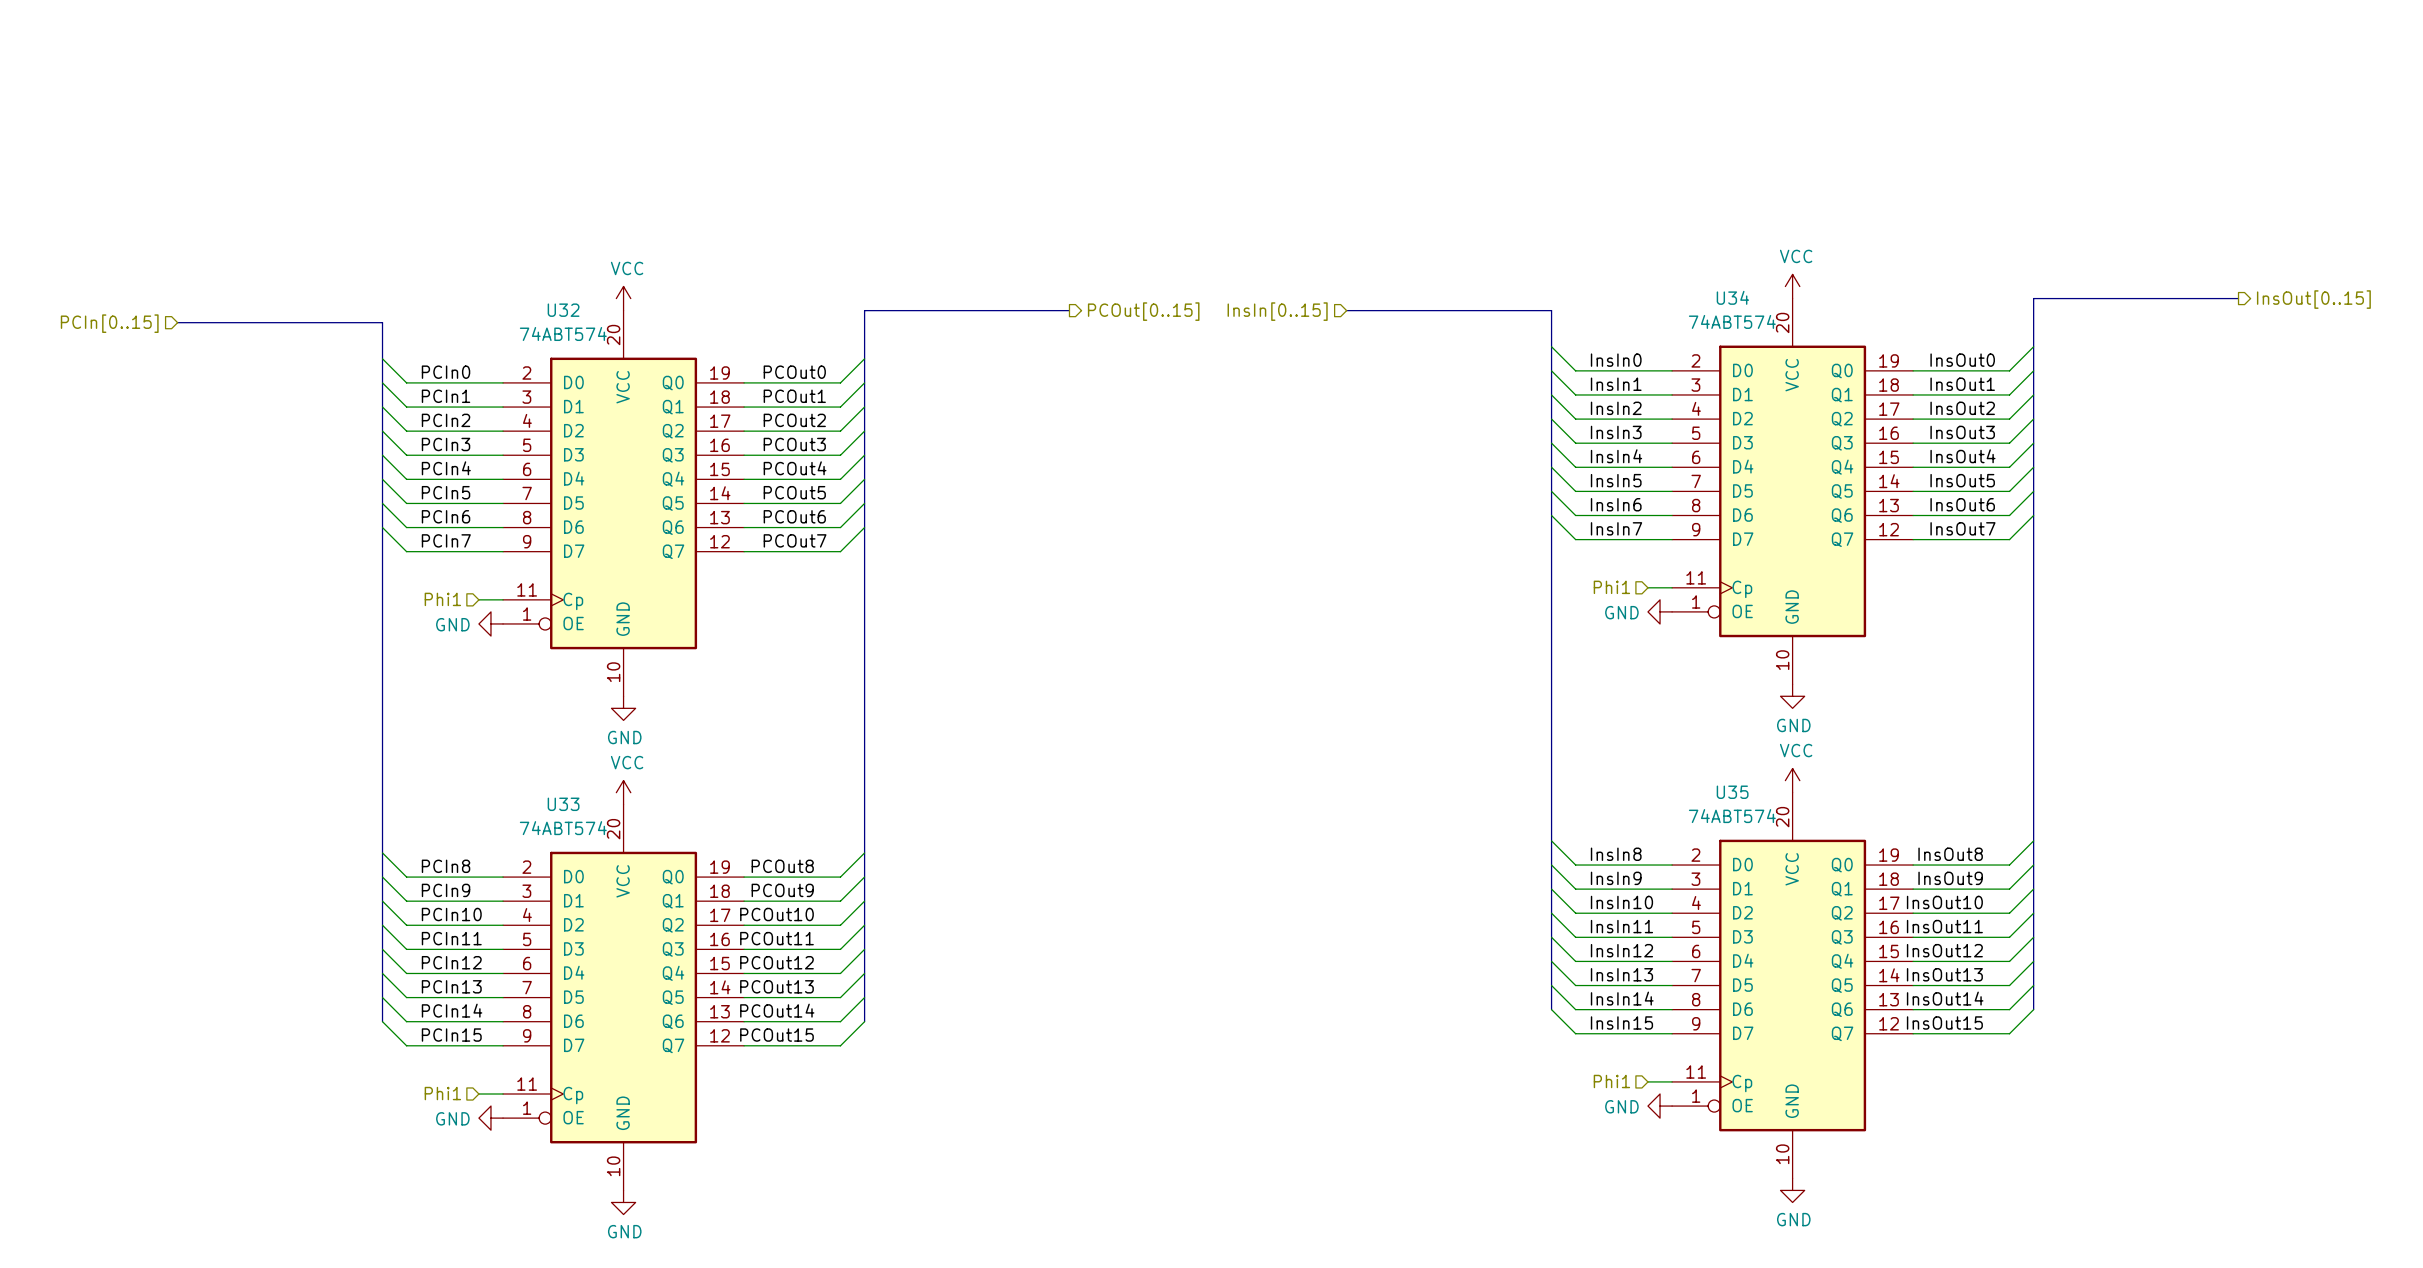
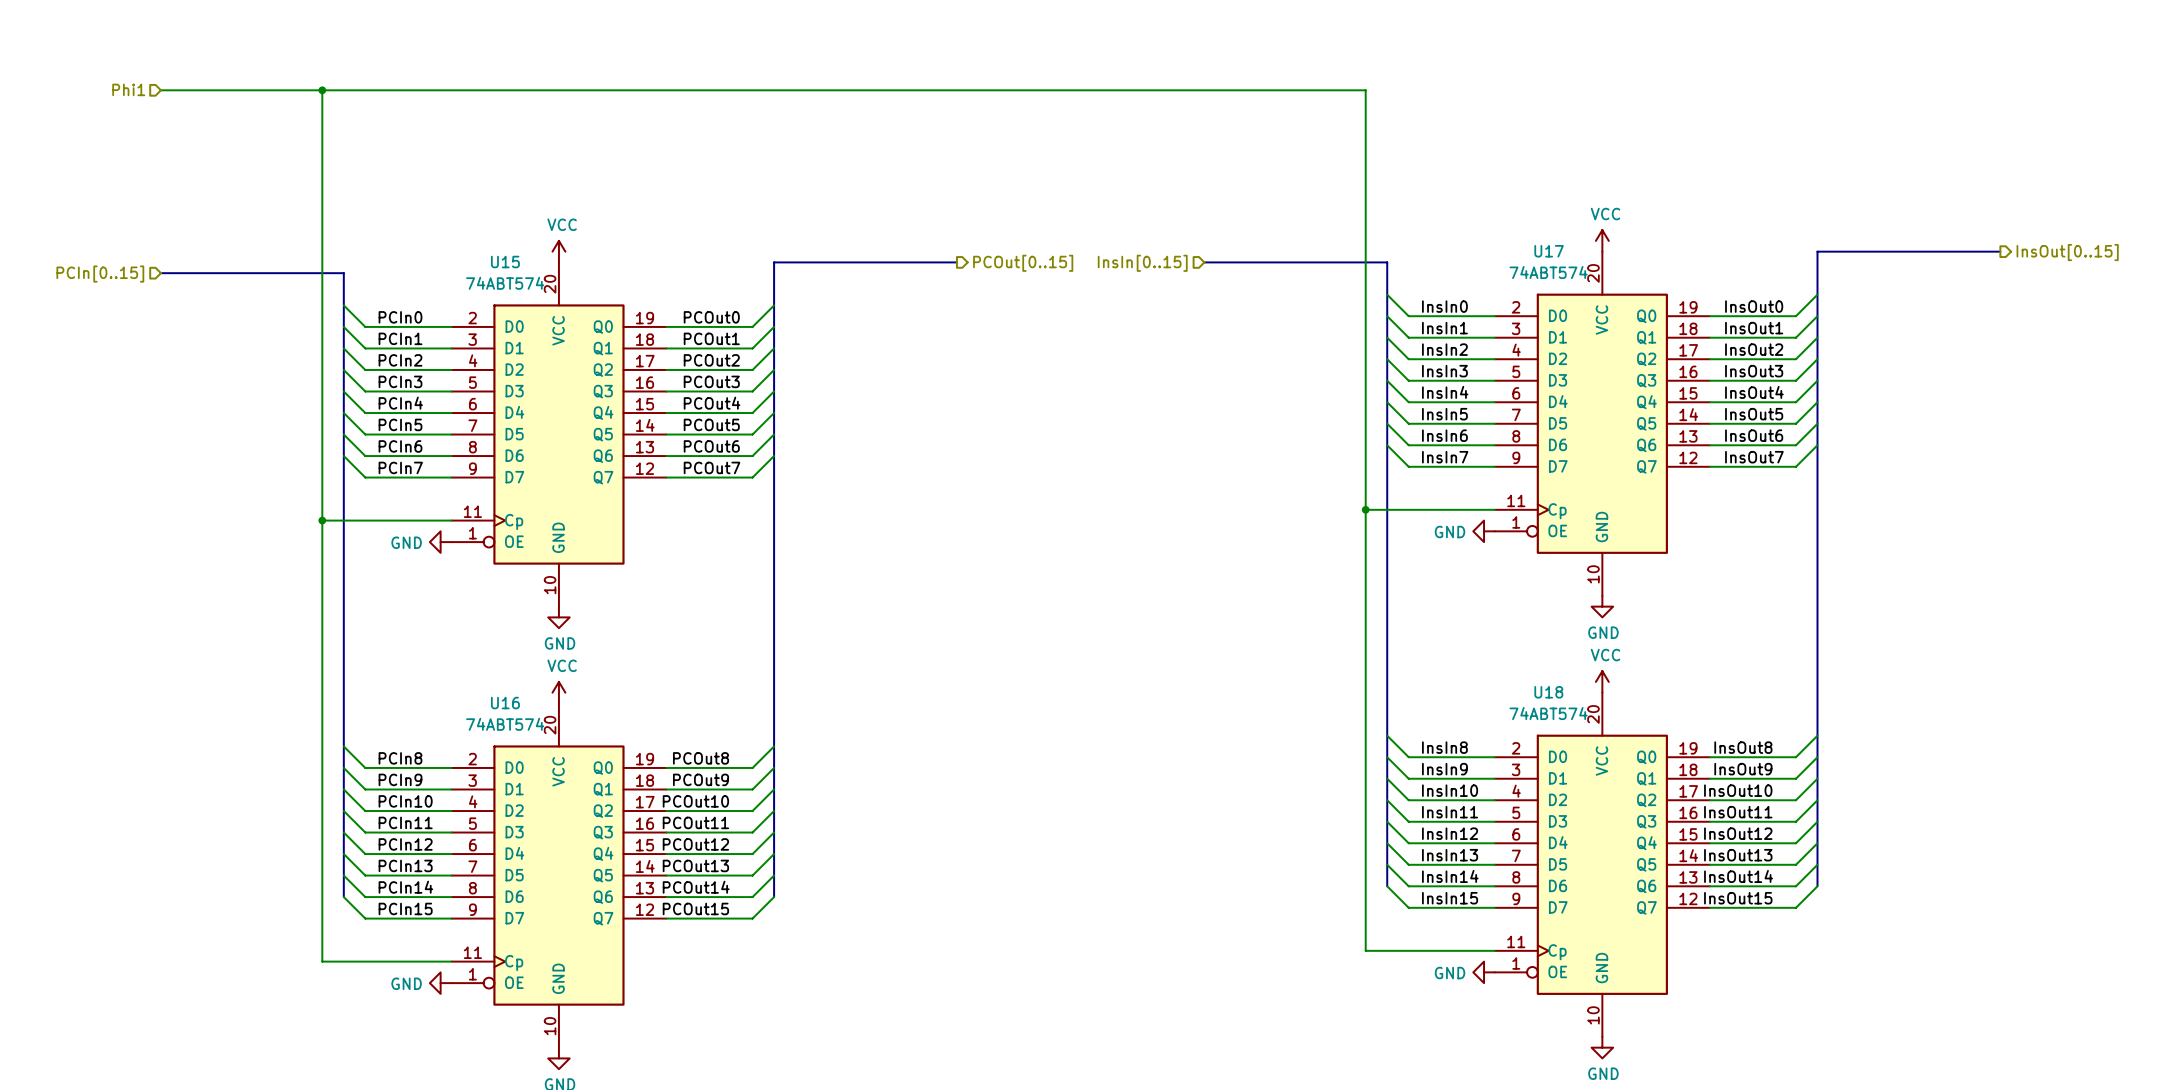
hierarchical label: none -> Phi1 (128, 89)
wire: none -> (160, 90) (1365, 90) (1365, 950) (1473, 950)
wire: none -> (322, 90) (322, 961) (429, 961)
junction: none -> (322, 90)
U34 name: U34 (1732, 297) -> U17 (1549, 251)
U32 name: U32 (563, 310) -> U15 (505, 262)
wire: none -> (1365, 509) (1473, 509)
junction: none -> (1365, 509)
hierarchical label: Phi1 (1611, 587) -> none
wire: none -> (322, 520) (429, 520)
junction: none -> (322, 520)
hierarchical label: Phi1 (442, 599) -> none
U35 name: U35 (1732, 792) -> U18 (1548, 692)
U33 name: U33 (563, 804) -> U16 (505, 703)
hierarchical label: Phi1 (1611, 1081) -> none
hierarchical label: Phi1 (442, 1093) -> none

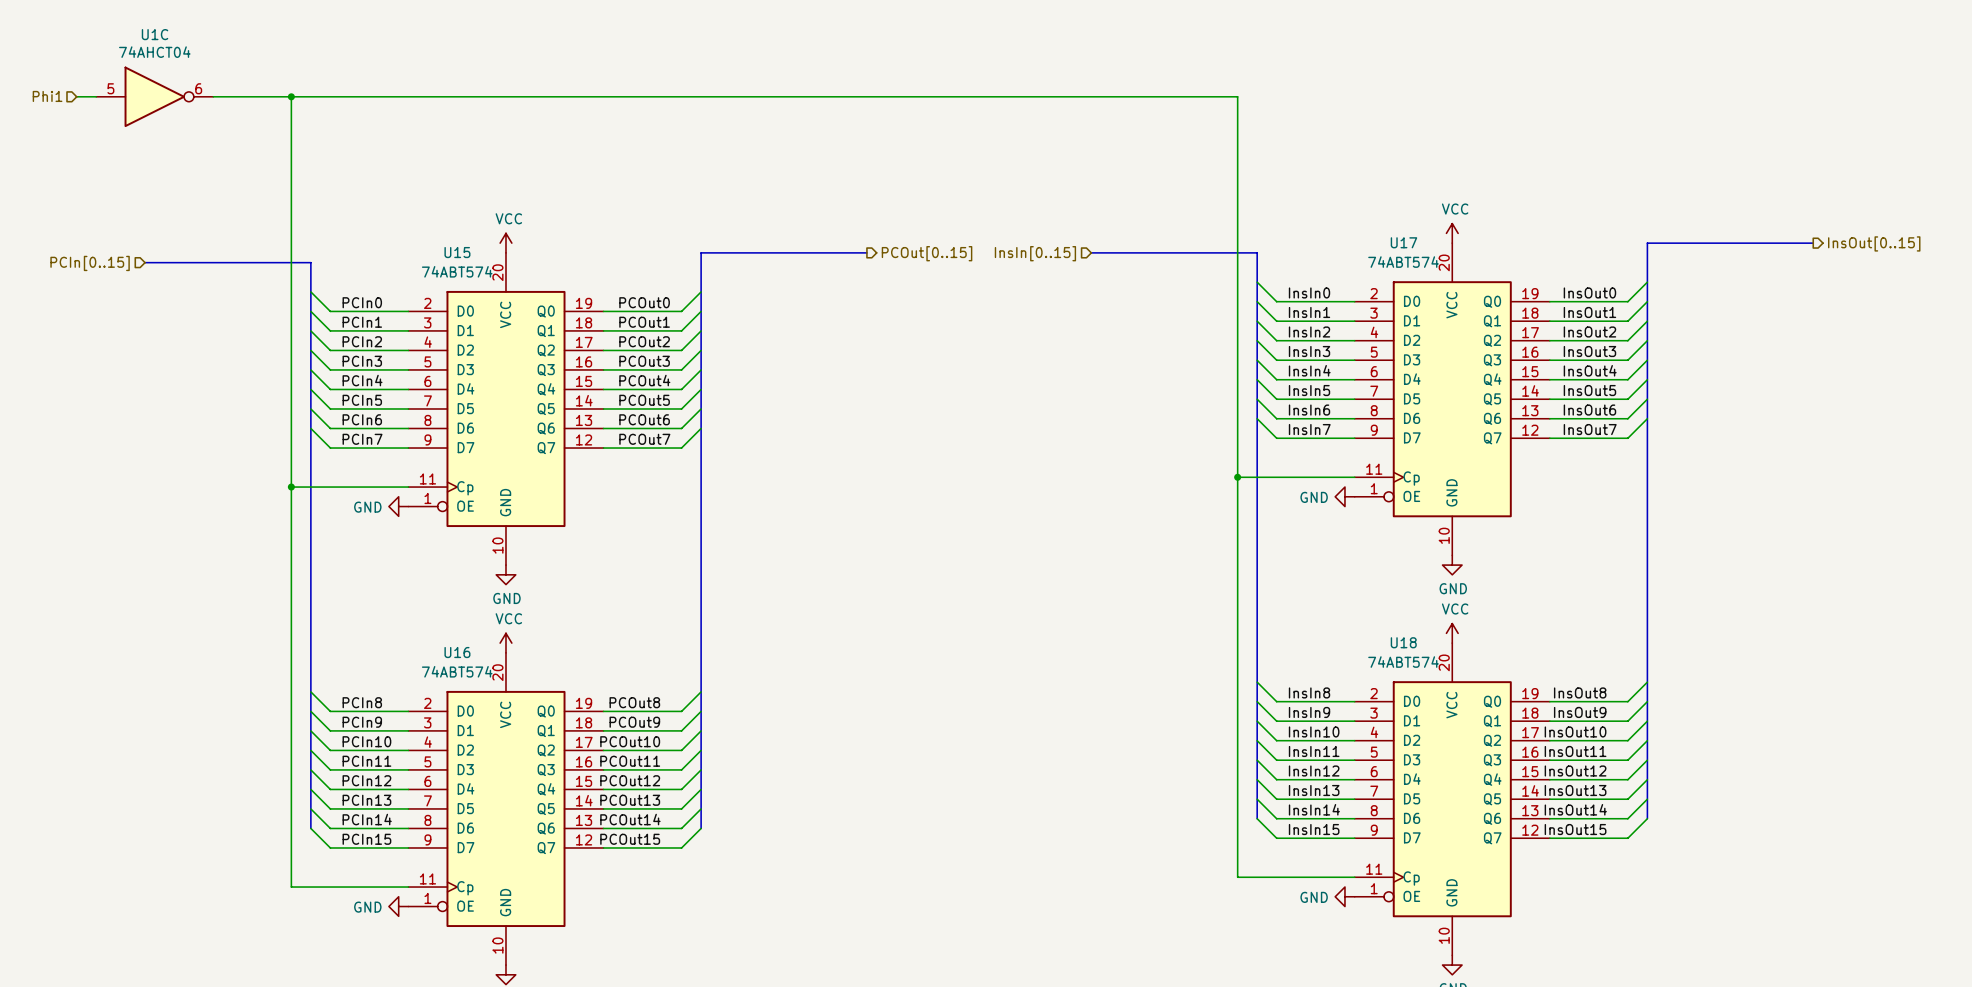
hierarchical label position: Phi1 (128, 89) -> Phi1 (47, 96)
wire: none -> (76, 96) (96, 96)
U1C: none -> 74AHCT04 (154, 96)

